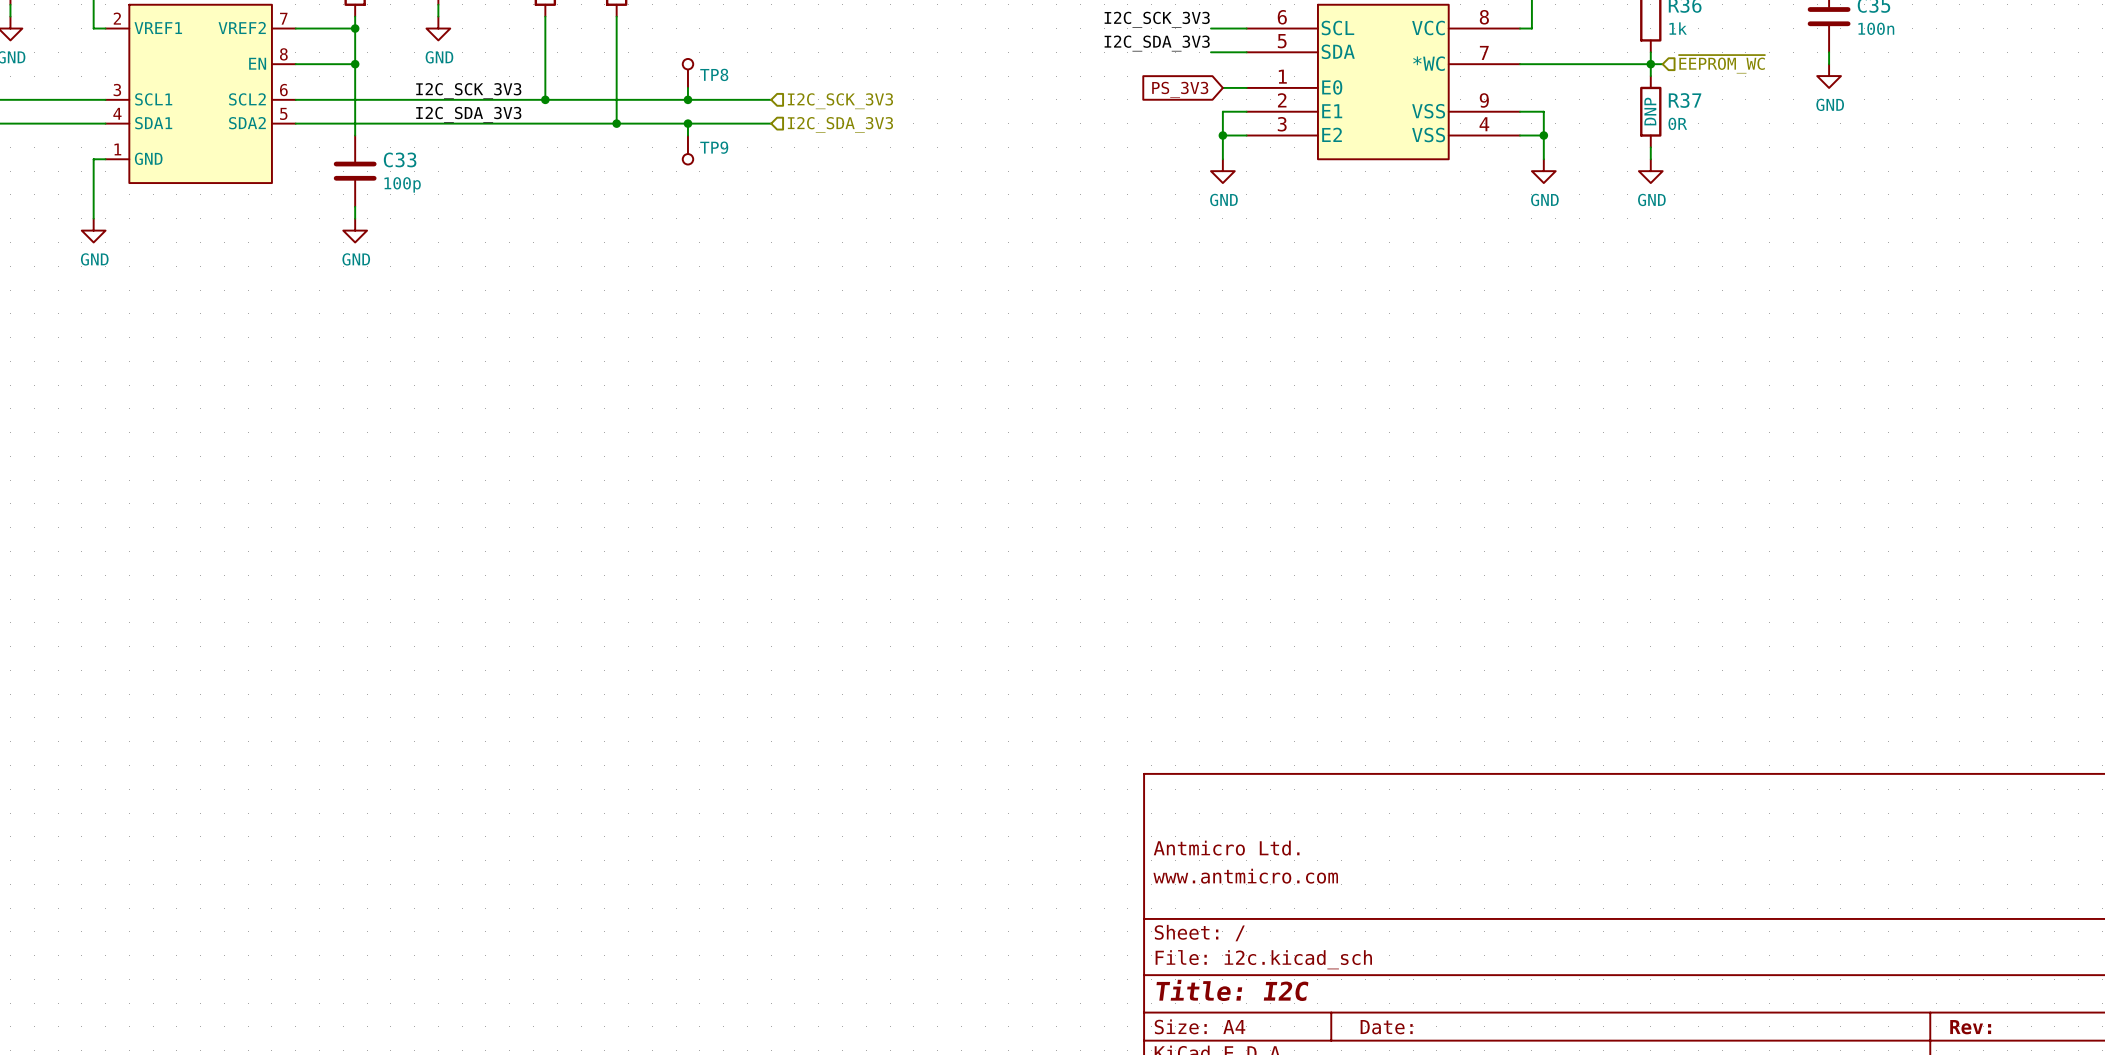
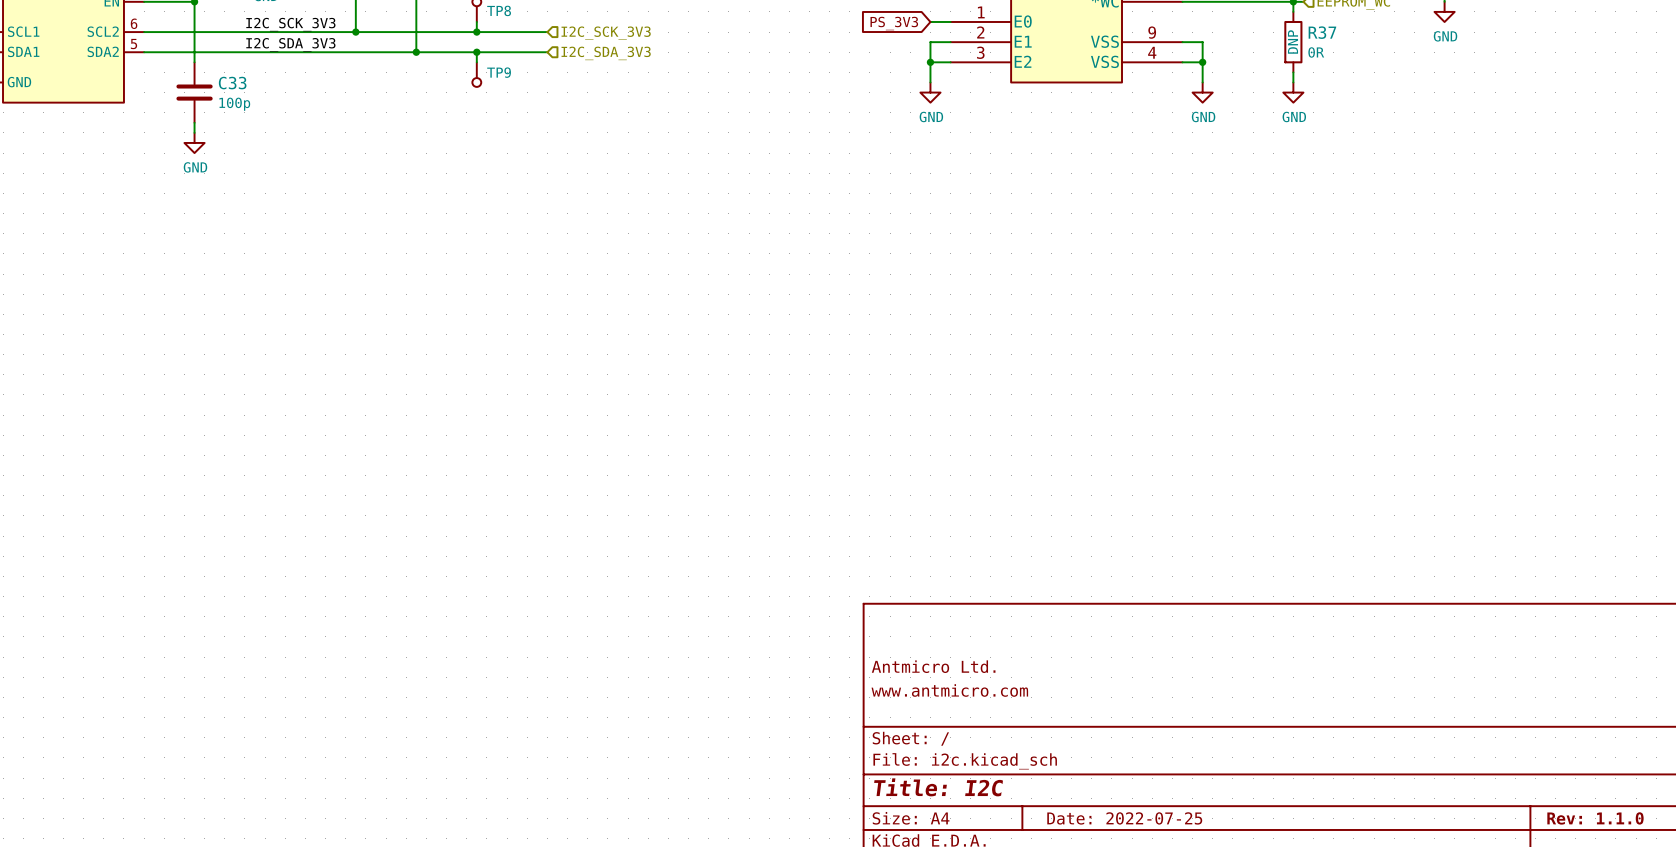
title block: Date: (1386, 1027) -> Date: 2022-07-25 (1124, 818)
title block: Rev: (1970, 1027) -> Rev: 1.1.0 (1595, 818)

